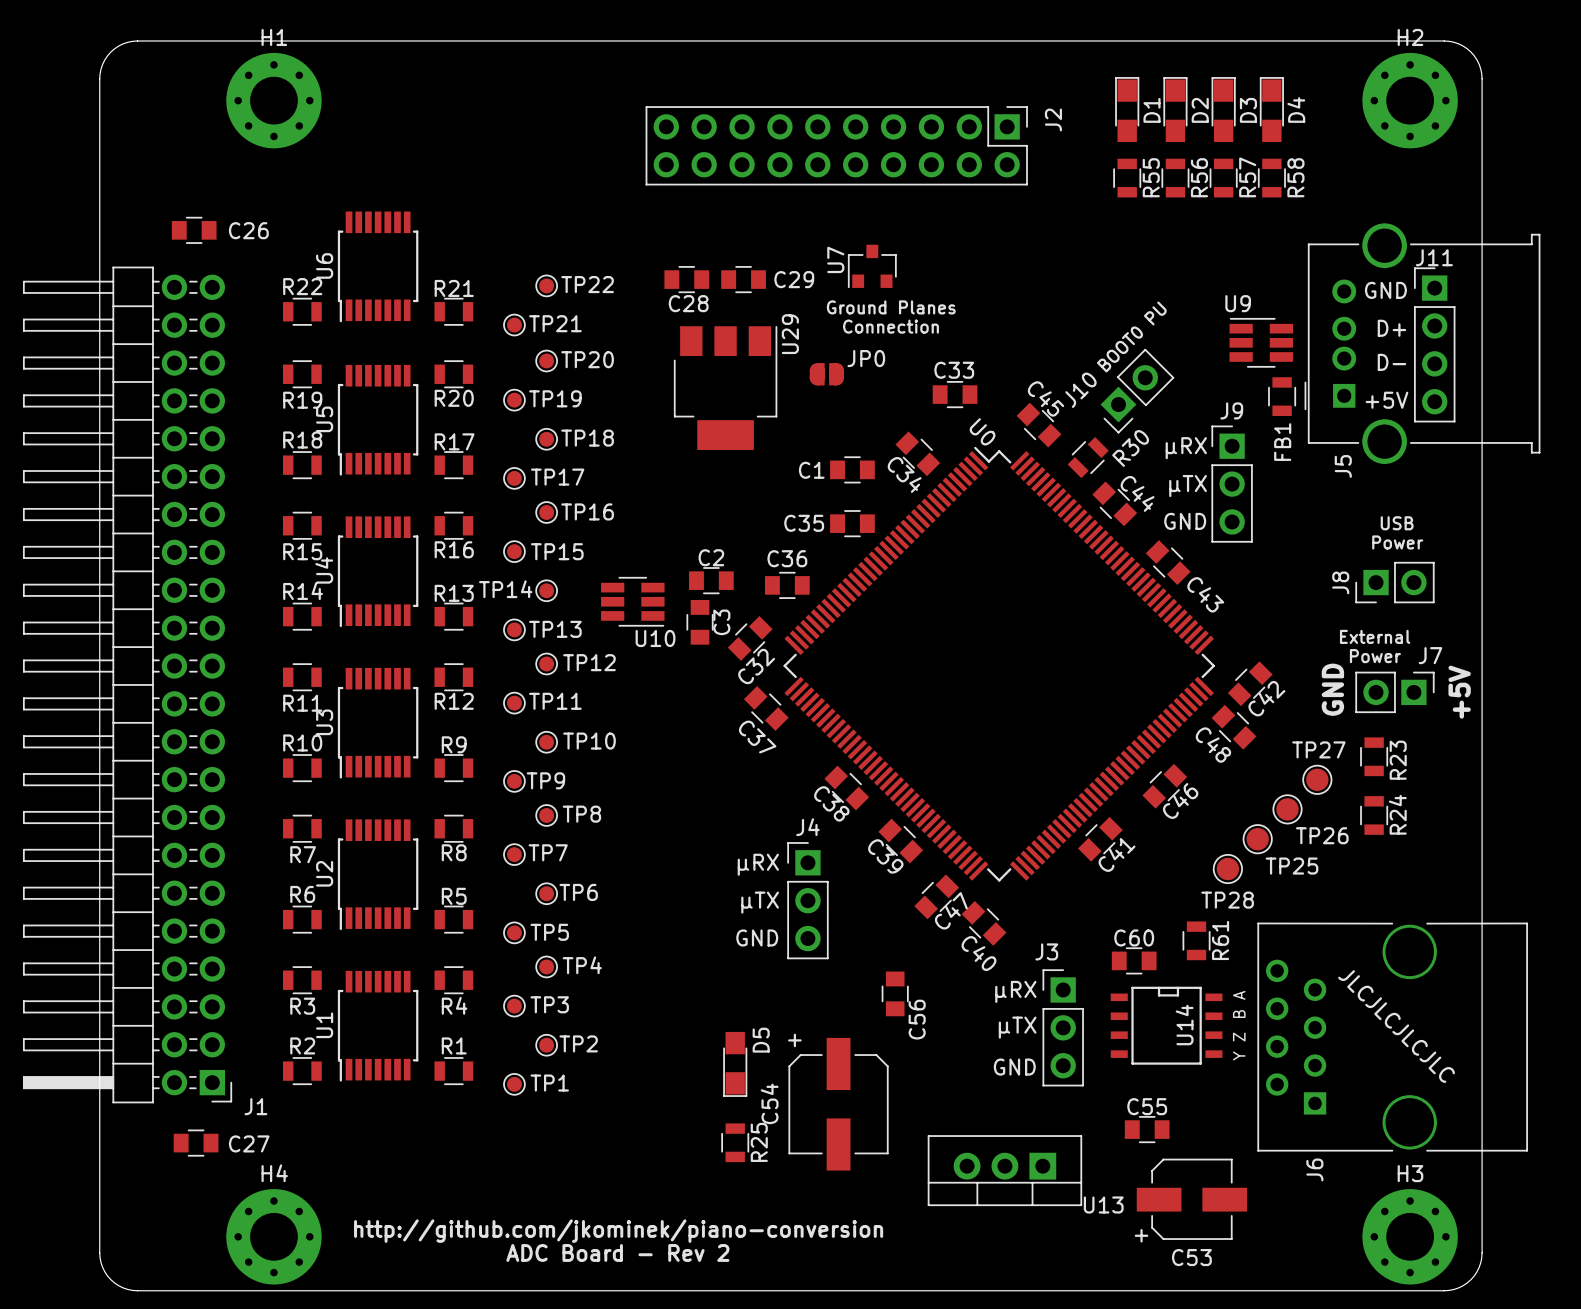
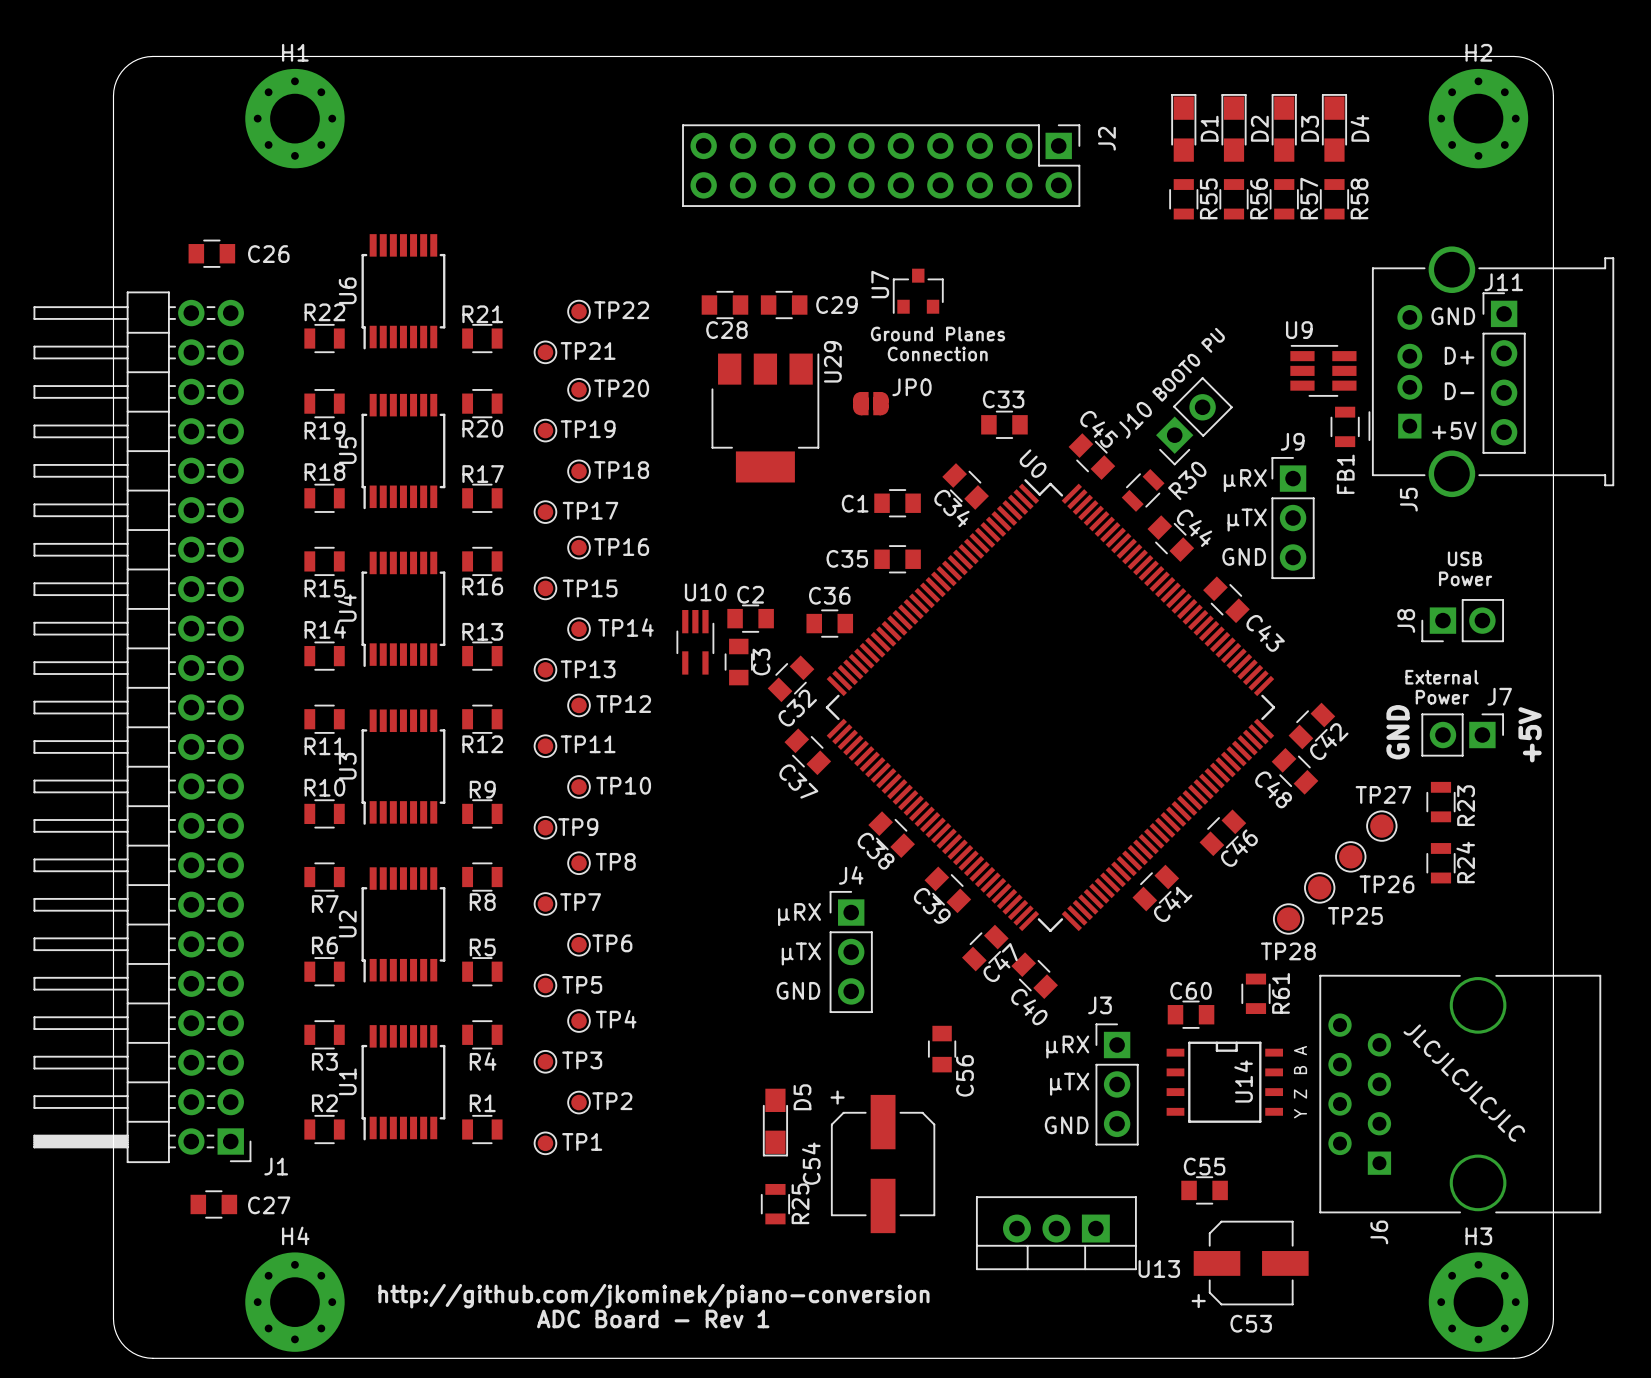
U10 footprint: [601, 576, 665, 627] -> [676, 610, 715, 675]
TP14 name position: TP14 (505, 589) -> TP14 (625, 627)
U10 name position: U10 (655, 638) -> U10 (705, 592)
text: ADC Board - Rev 2 (617, 1252) -> ADC Board - Rev 1 (653, 1318)

